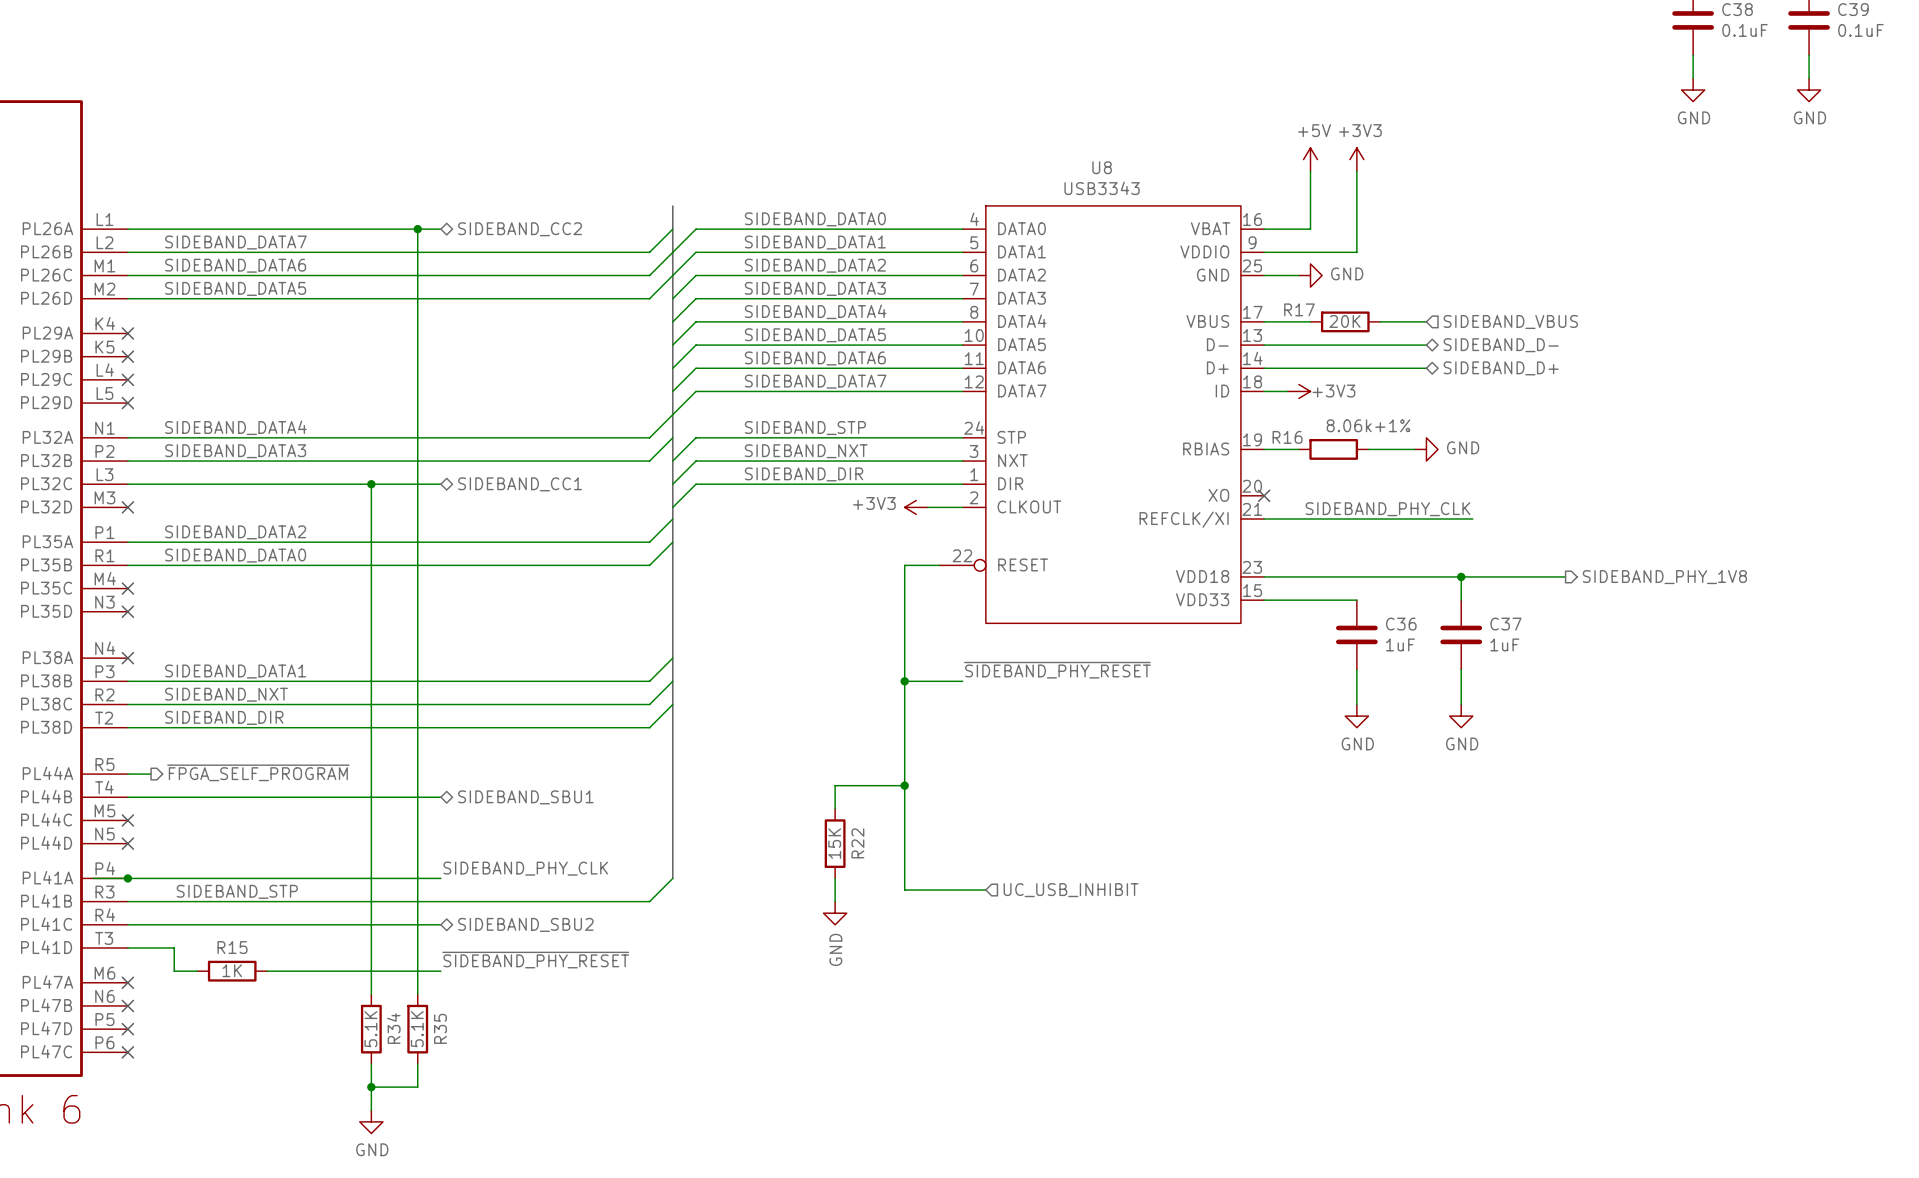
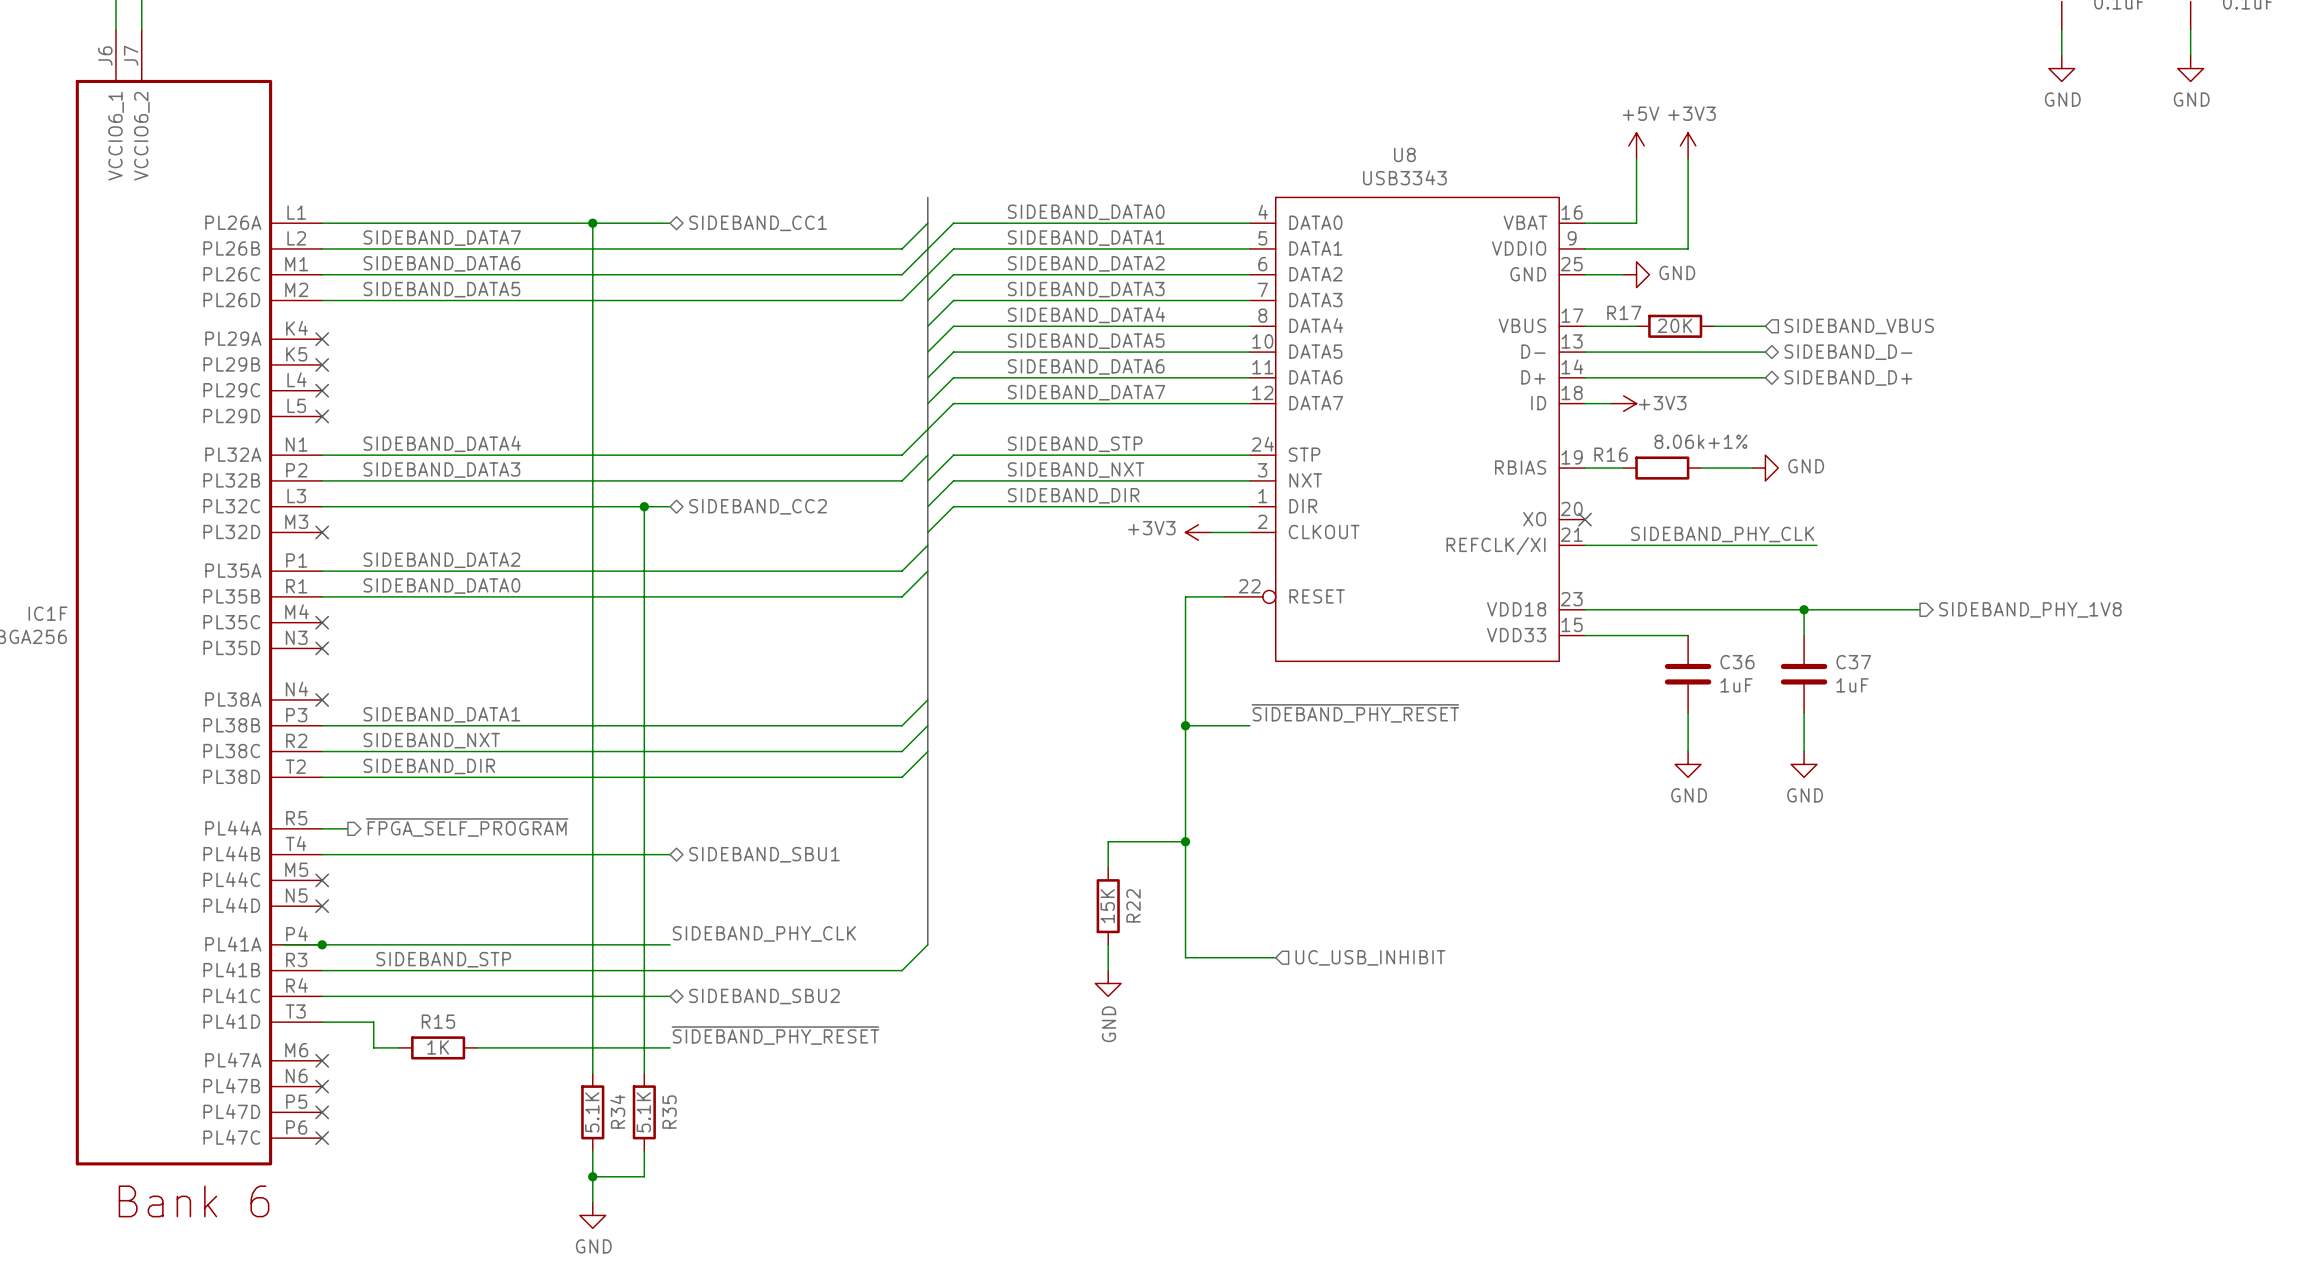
wire: (417, 229) (417, 484) -> (592, 223) (592, 506)
junction position: (417, 229) -> (592, 223)
hierarchical label: SIDEBAND_CC2 (520, 229) -> SIDEBAND_CC1 (758, 223)
junction position: (371, 484) -> (644, 506)
hierarchical label: SIDEBAND_CC1 (520, 484) -> SIDEBAND_CC2 (758, 506)

